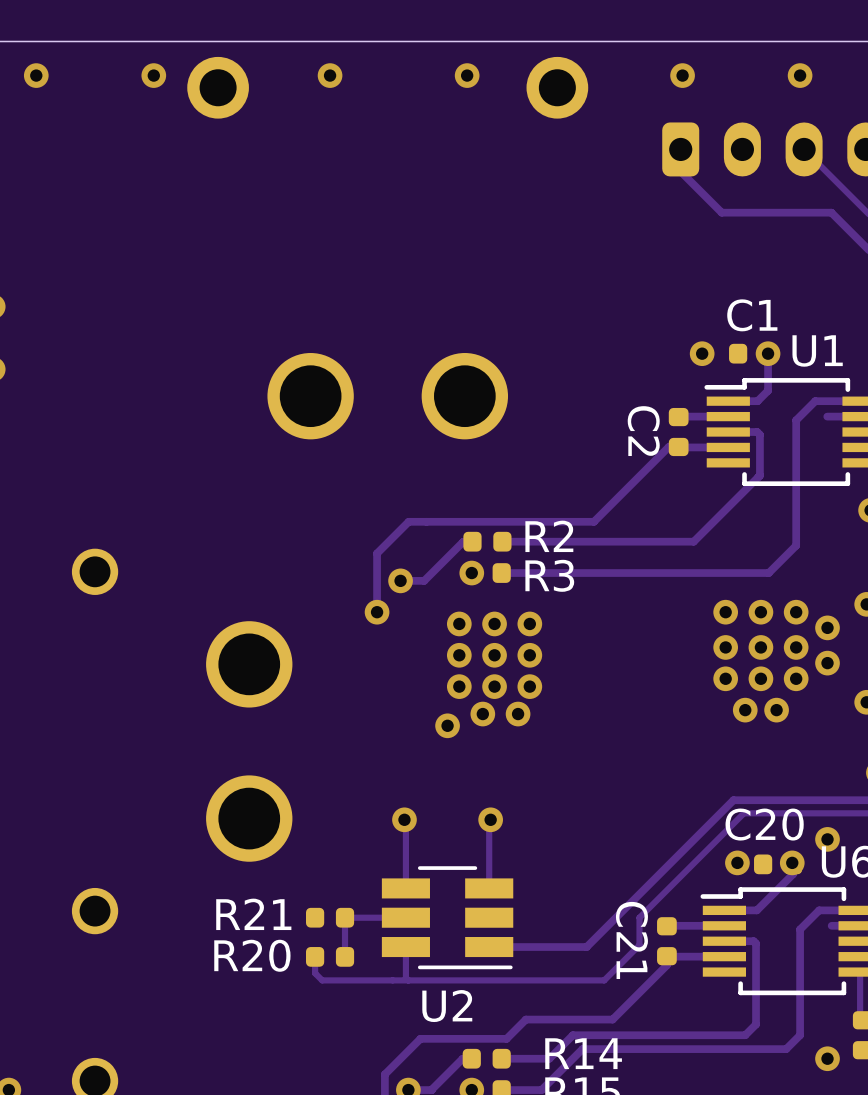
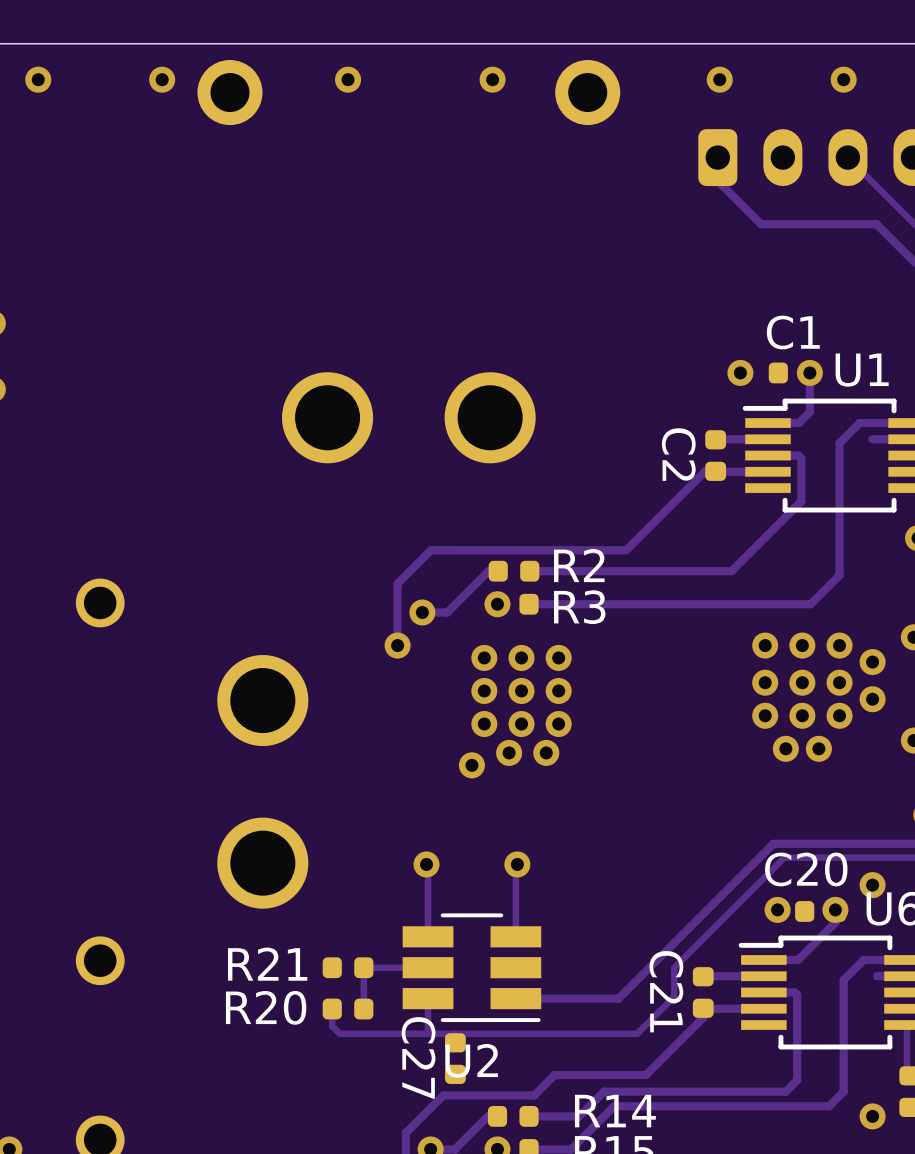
C27: none -> (455, 1058)

